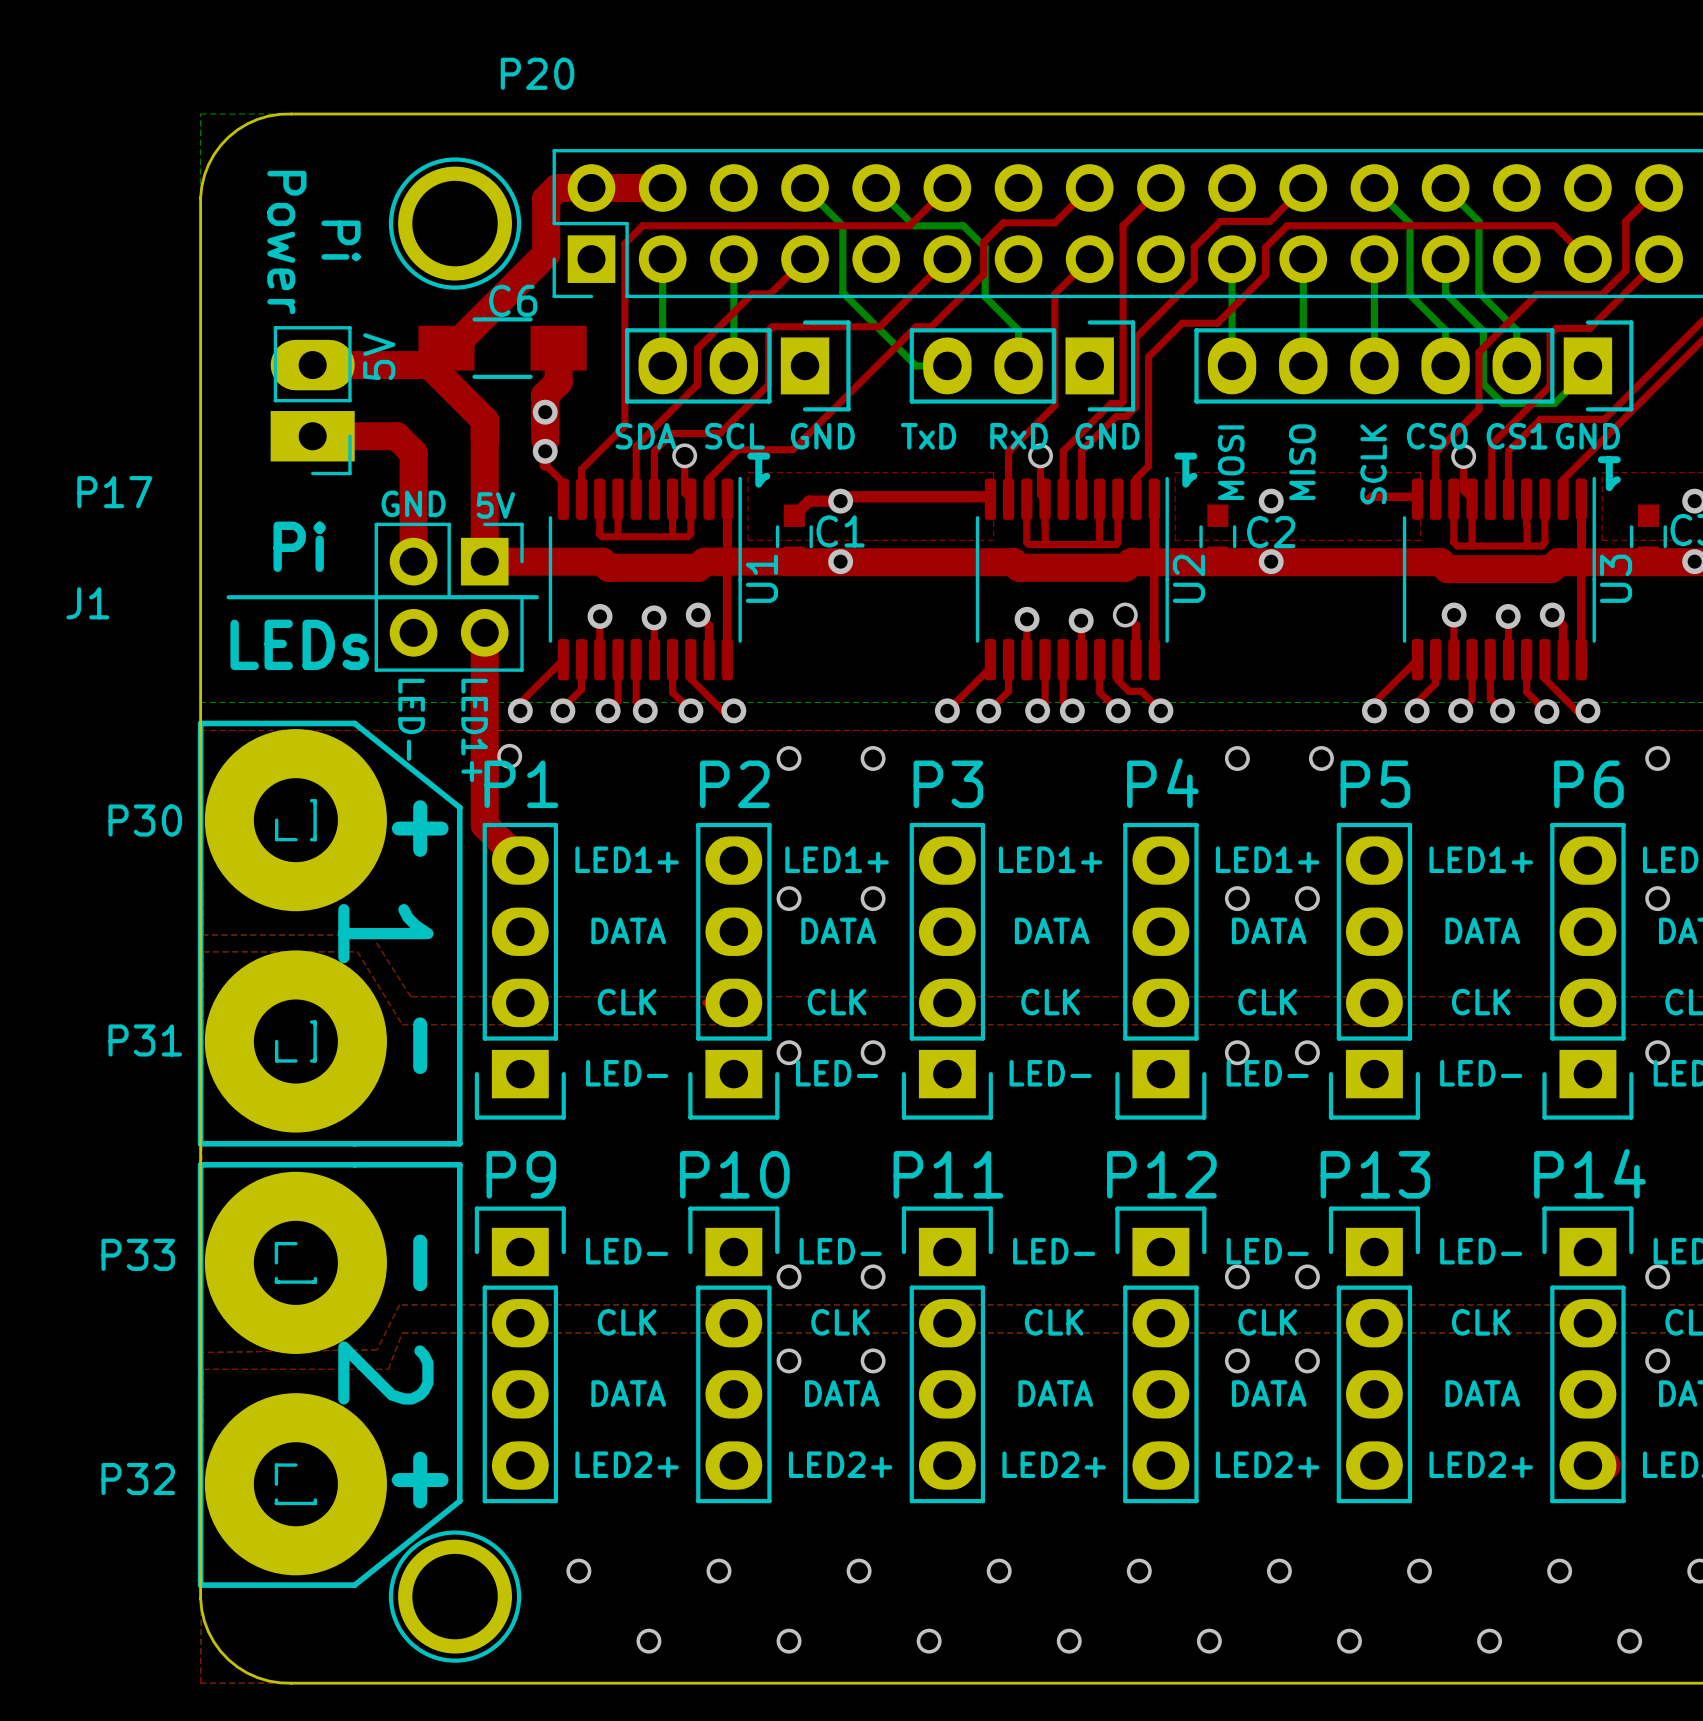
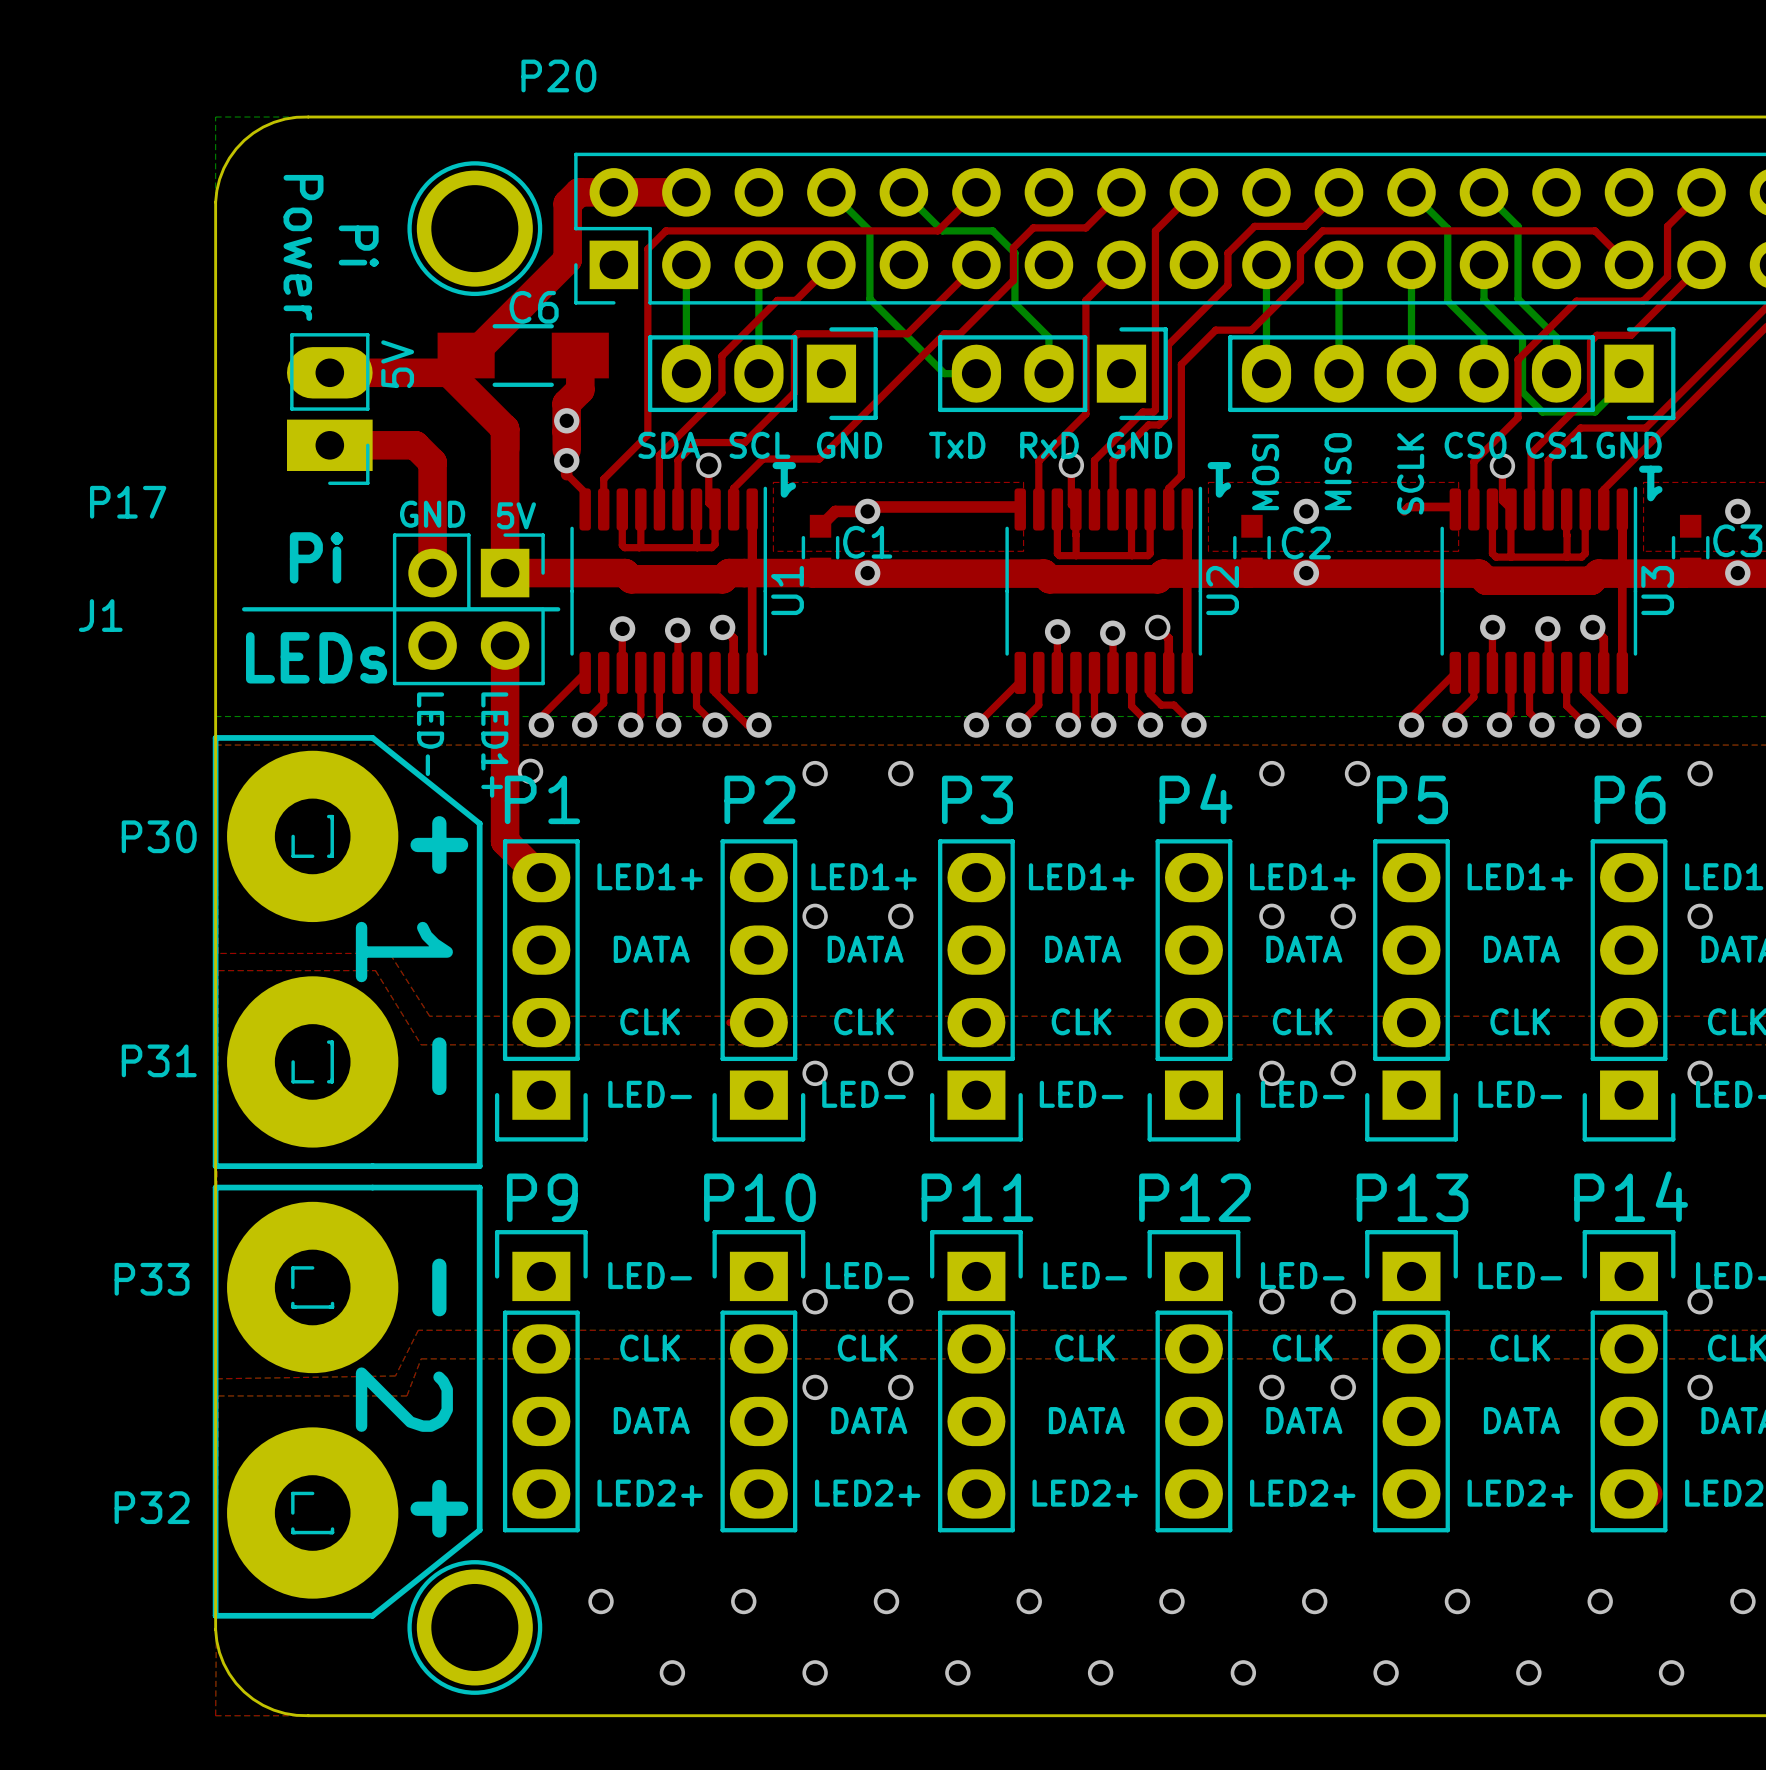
P30 footprint: [204, 729, 387, 912] -> [227, 750, 399, 923]
P31 footprint: [204, 950, 387, 1133] -> [227, 976, 399, 1148]
P33 footprint: [204, 1171, 387, 1354] -> [227, 1201, 399, 1374]
P32 footprint: [204, 1393, 387, 1576] -> [227, 1427, 399, 1599]

